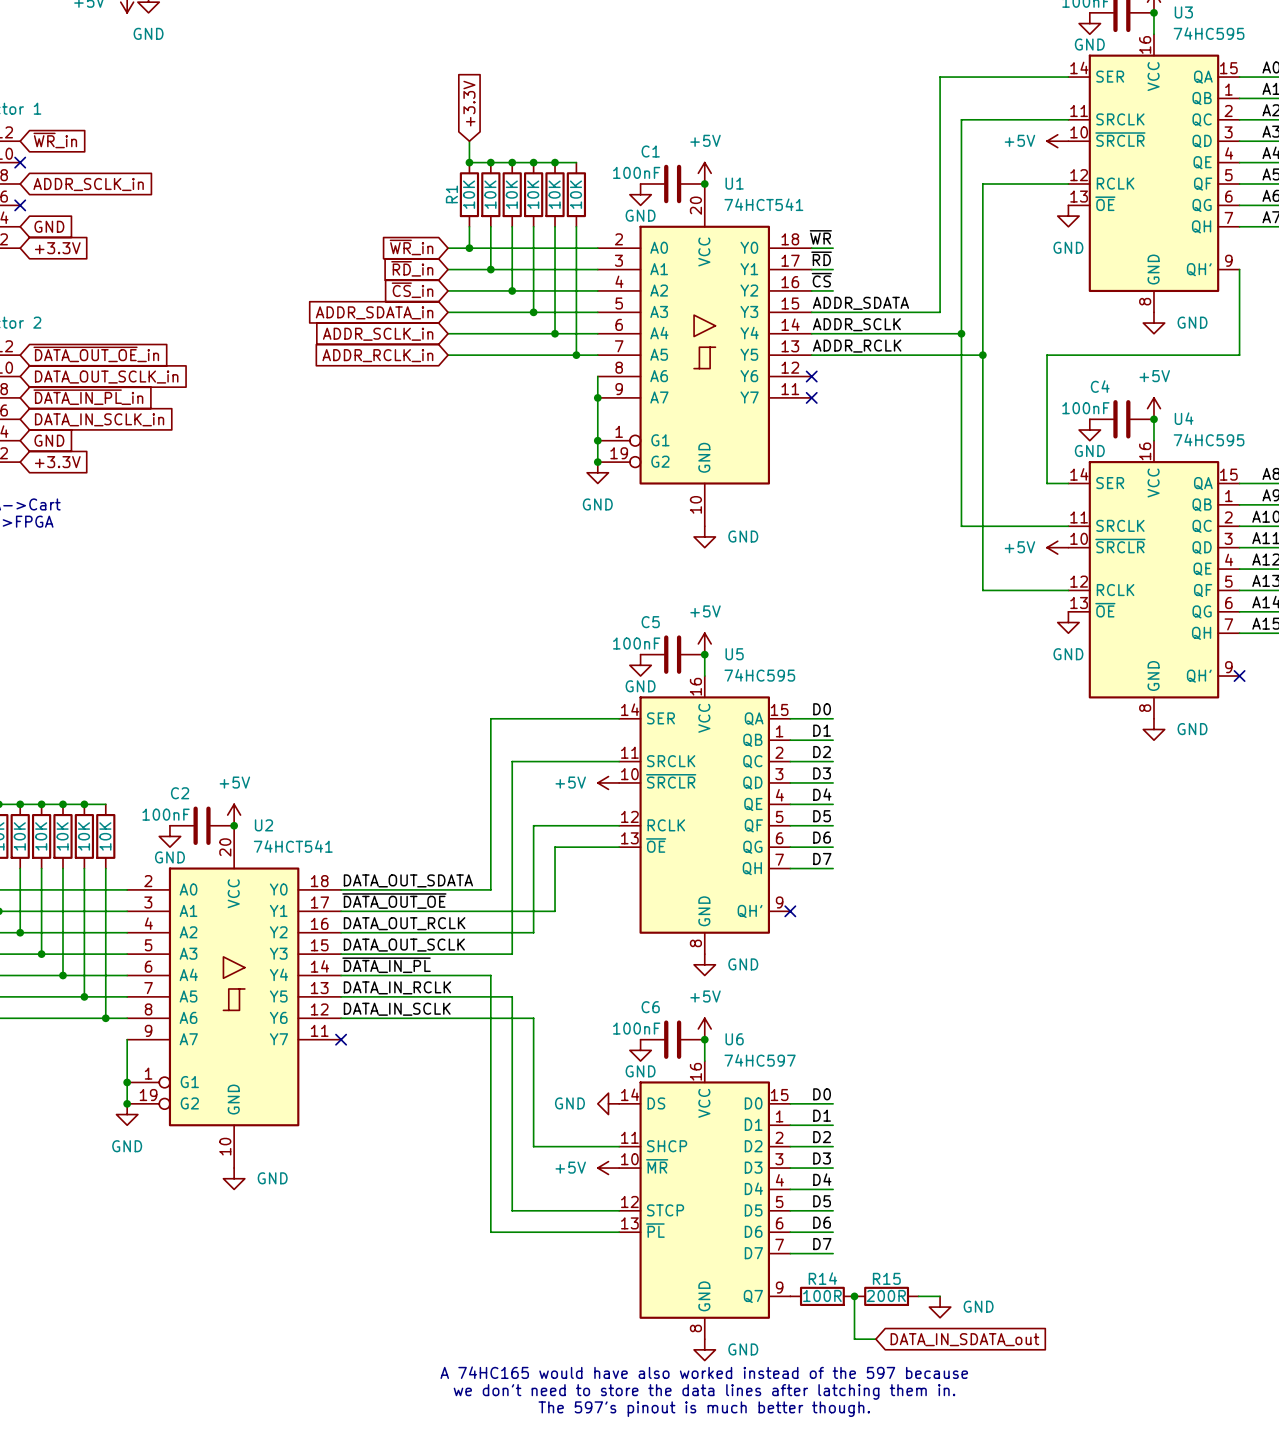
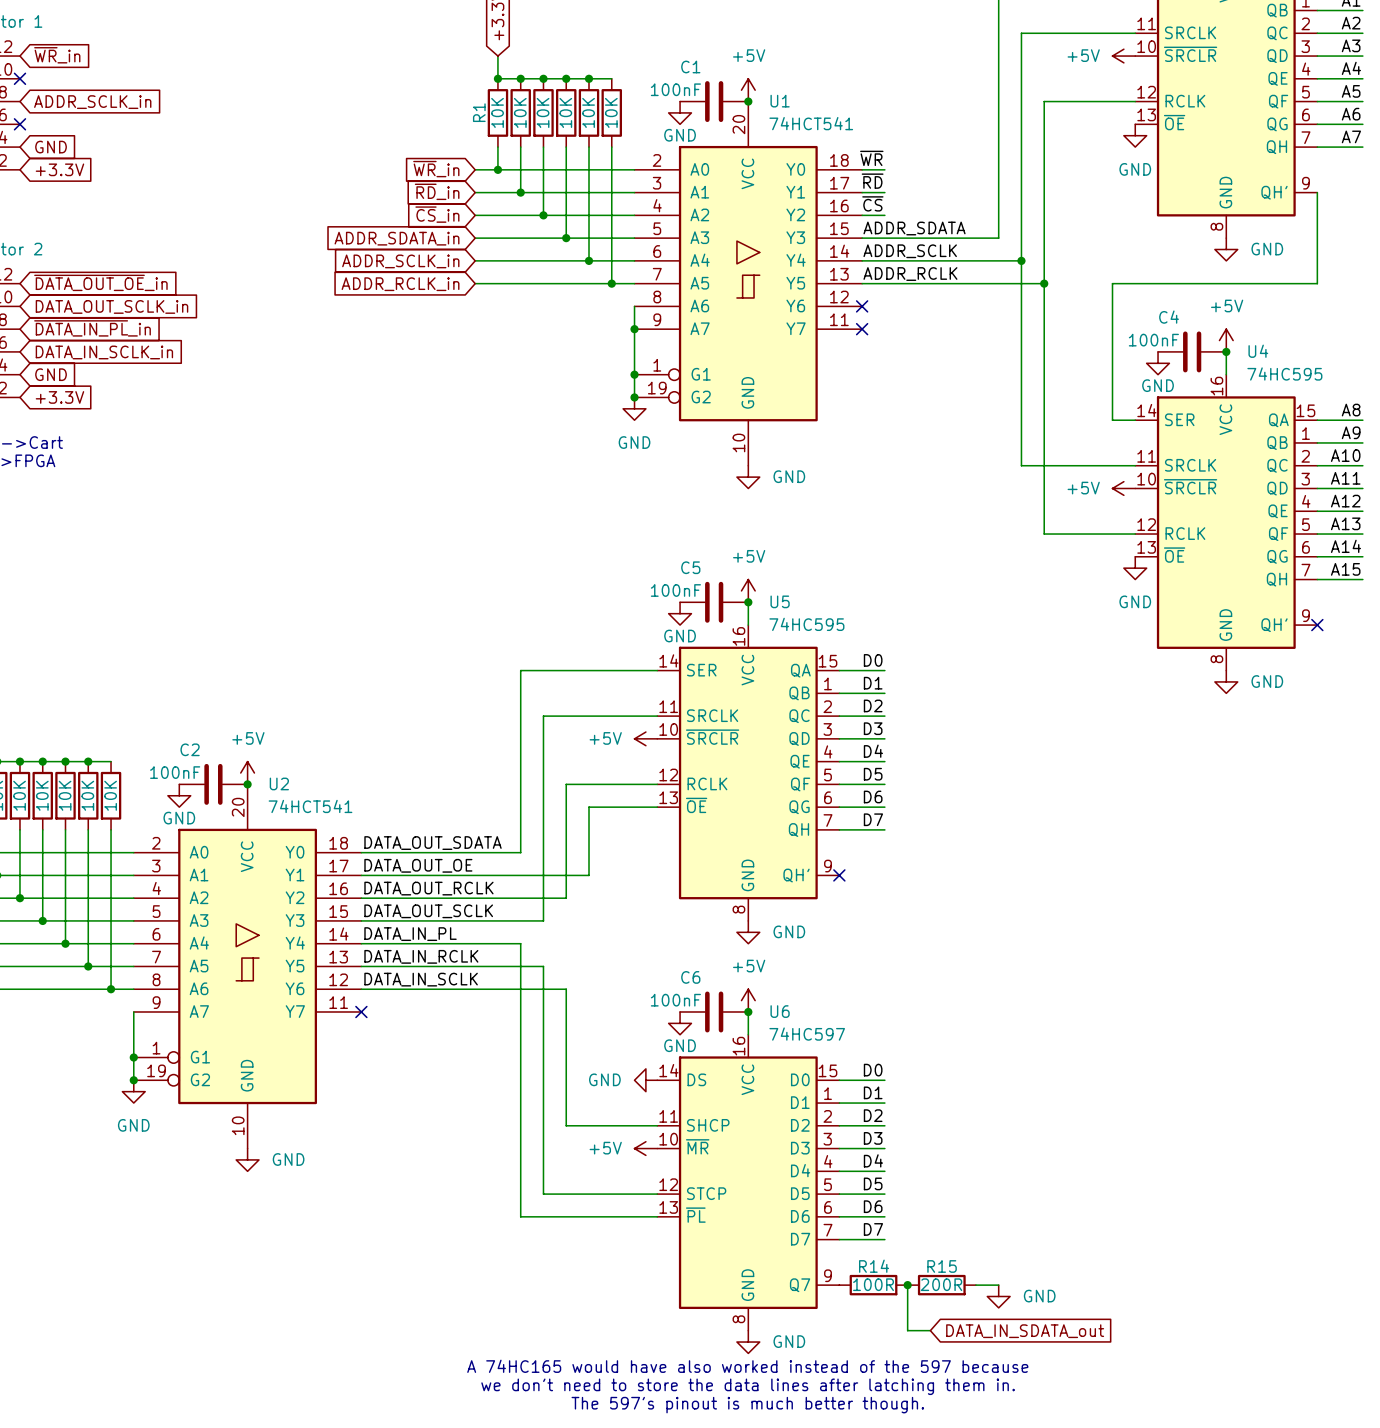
label: ~{DATA_OUT_OE} (394, 901) -> DATA_OUT_OE (418, 865)
label: ~{DATA_IN_PL} (386, 965) -> DATA_IN_PL (410, 934)

